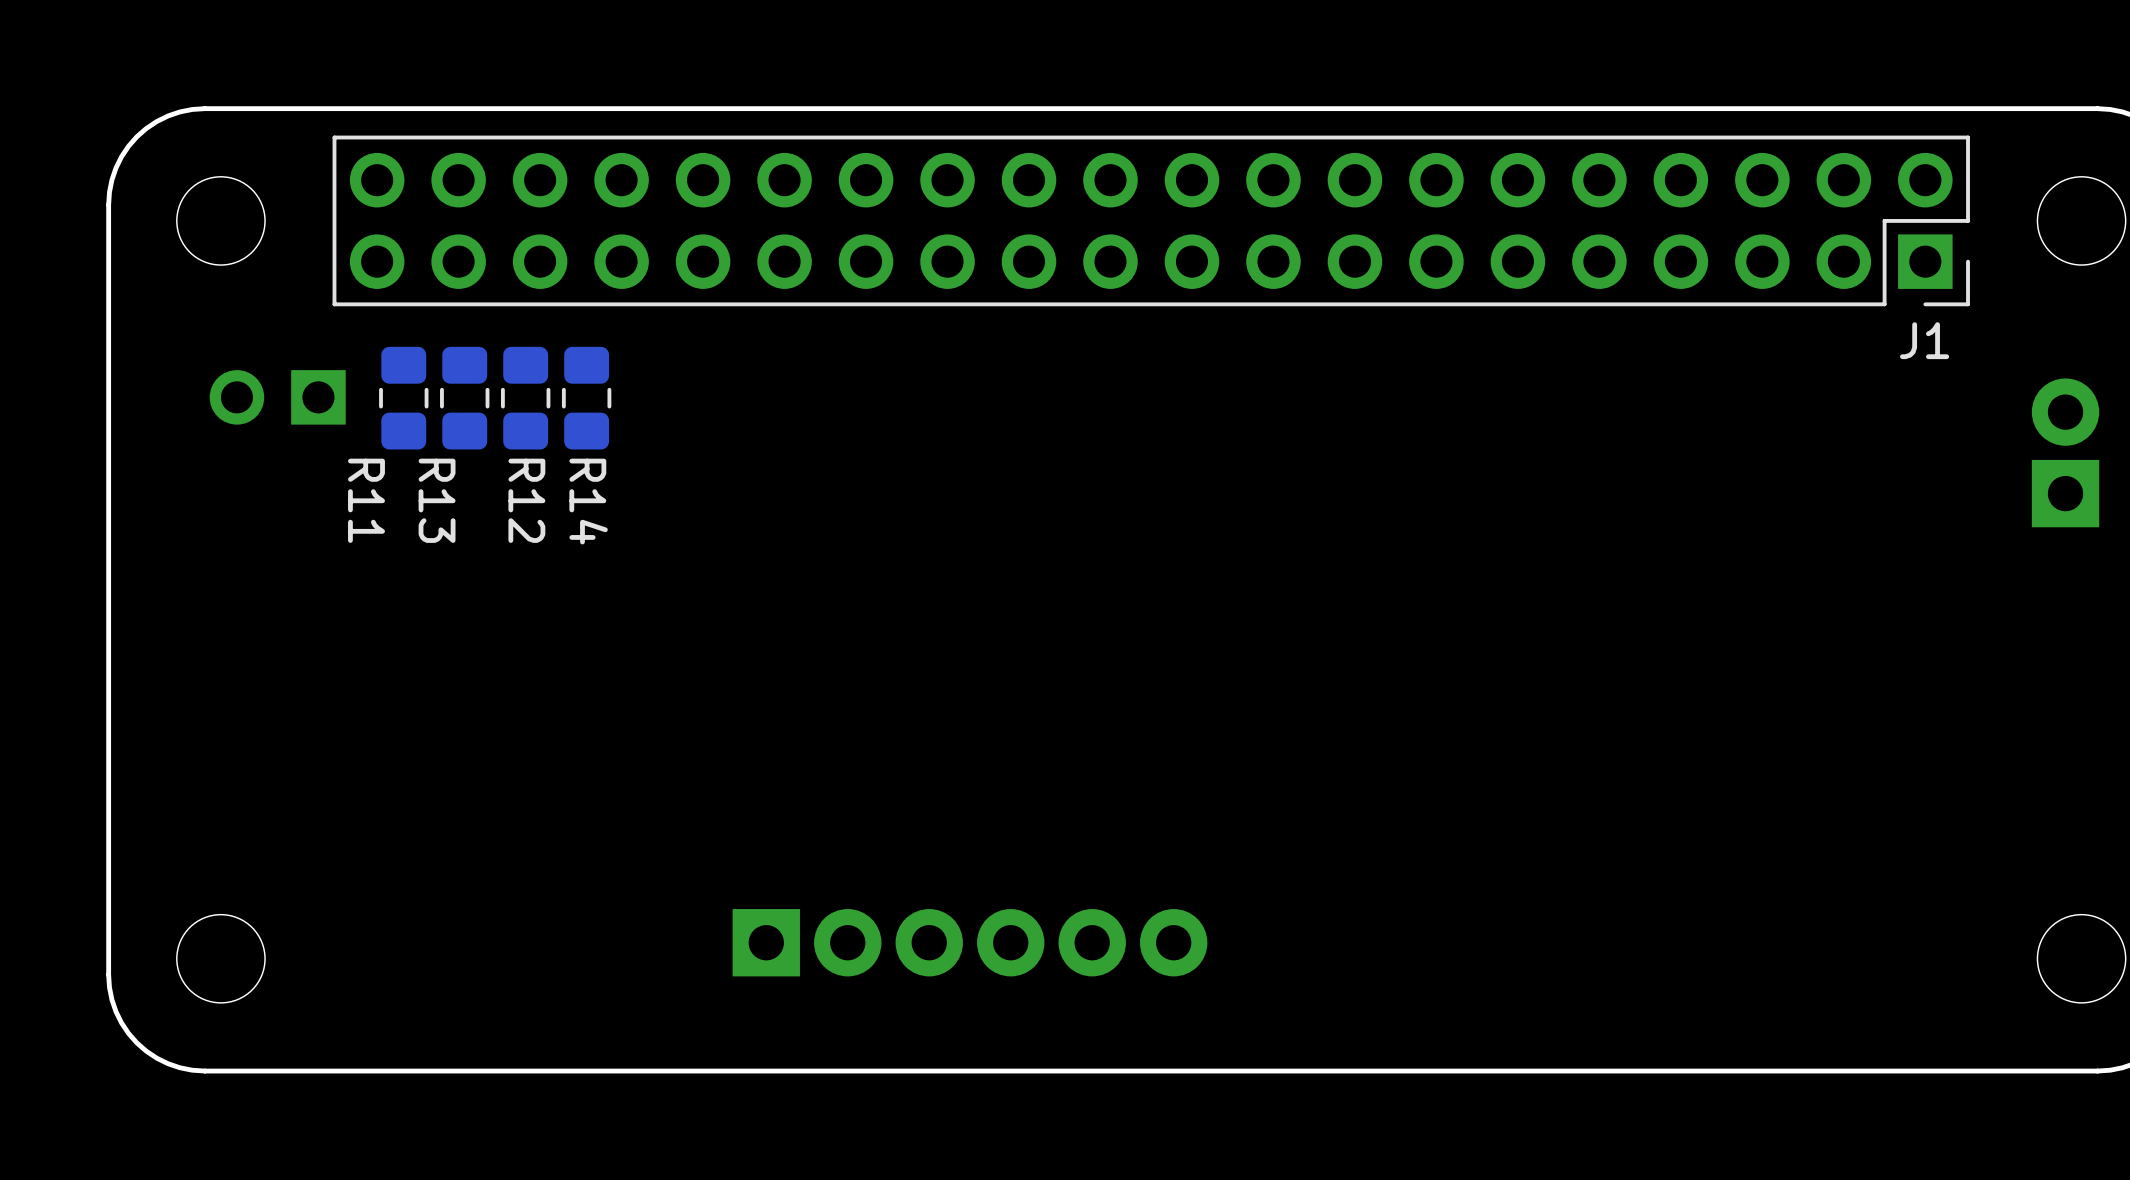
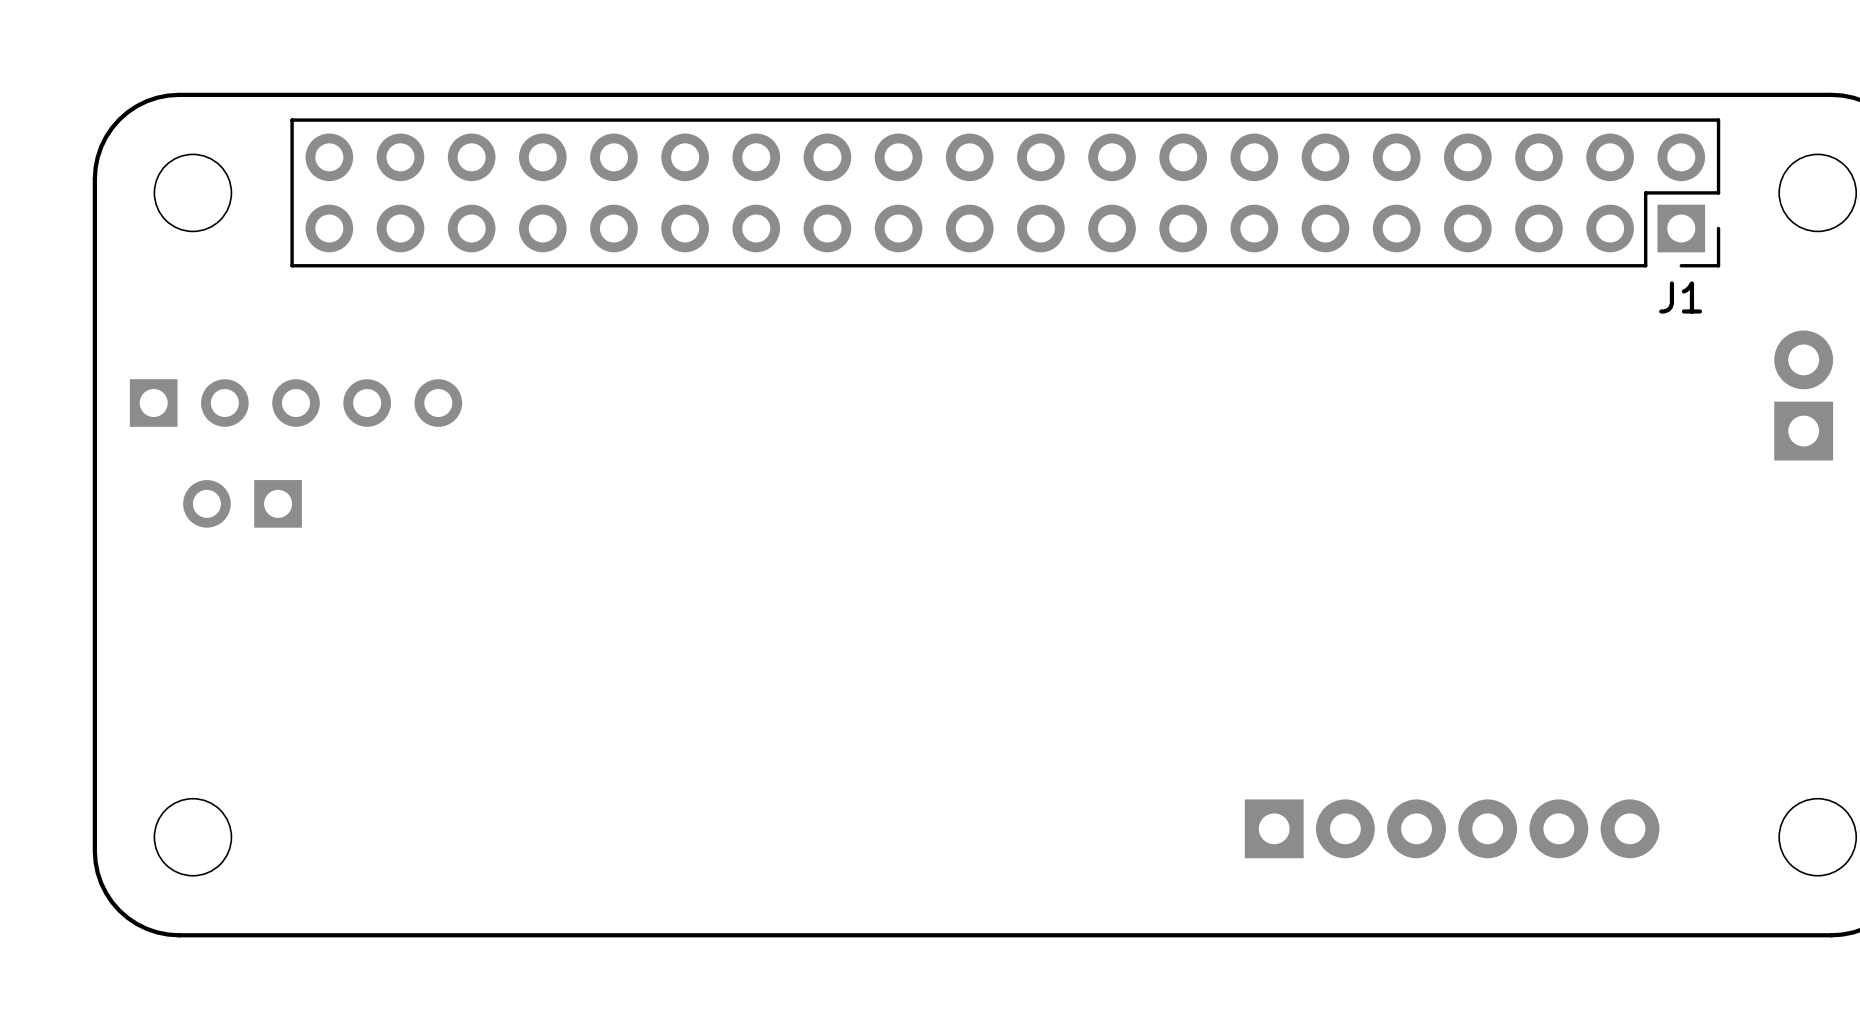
part position: (277, 397) -> (242, 503)
R11: (403, 398) -> none
R13: (464, 398) -> none
R12: (525, 398) -> none
R14: (586, 398) -> none
part: none -> (296, 403)
part position: (969, 942) -> (1452, 828)

